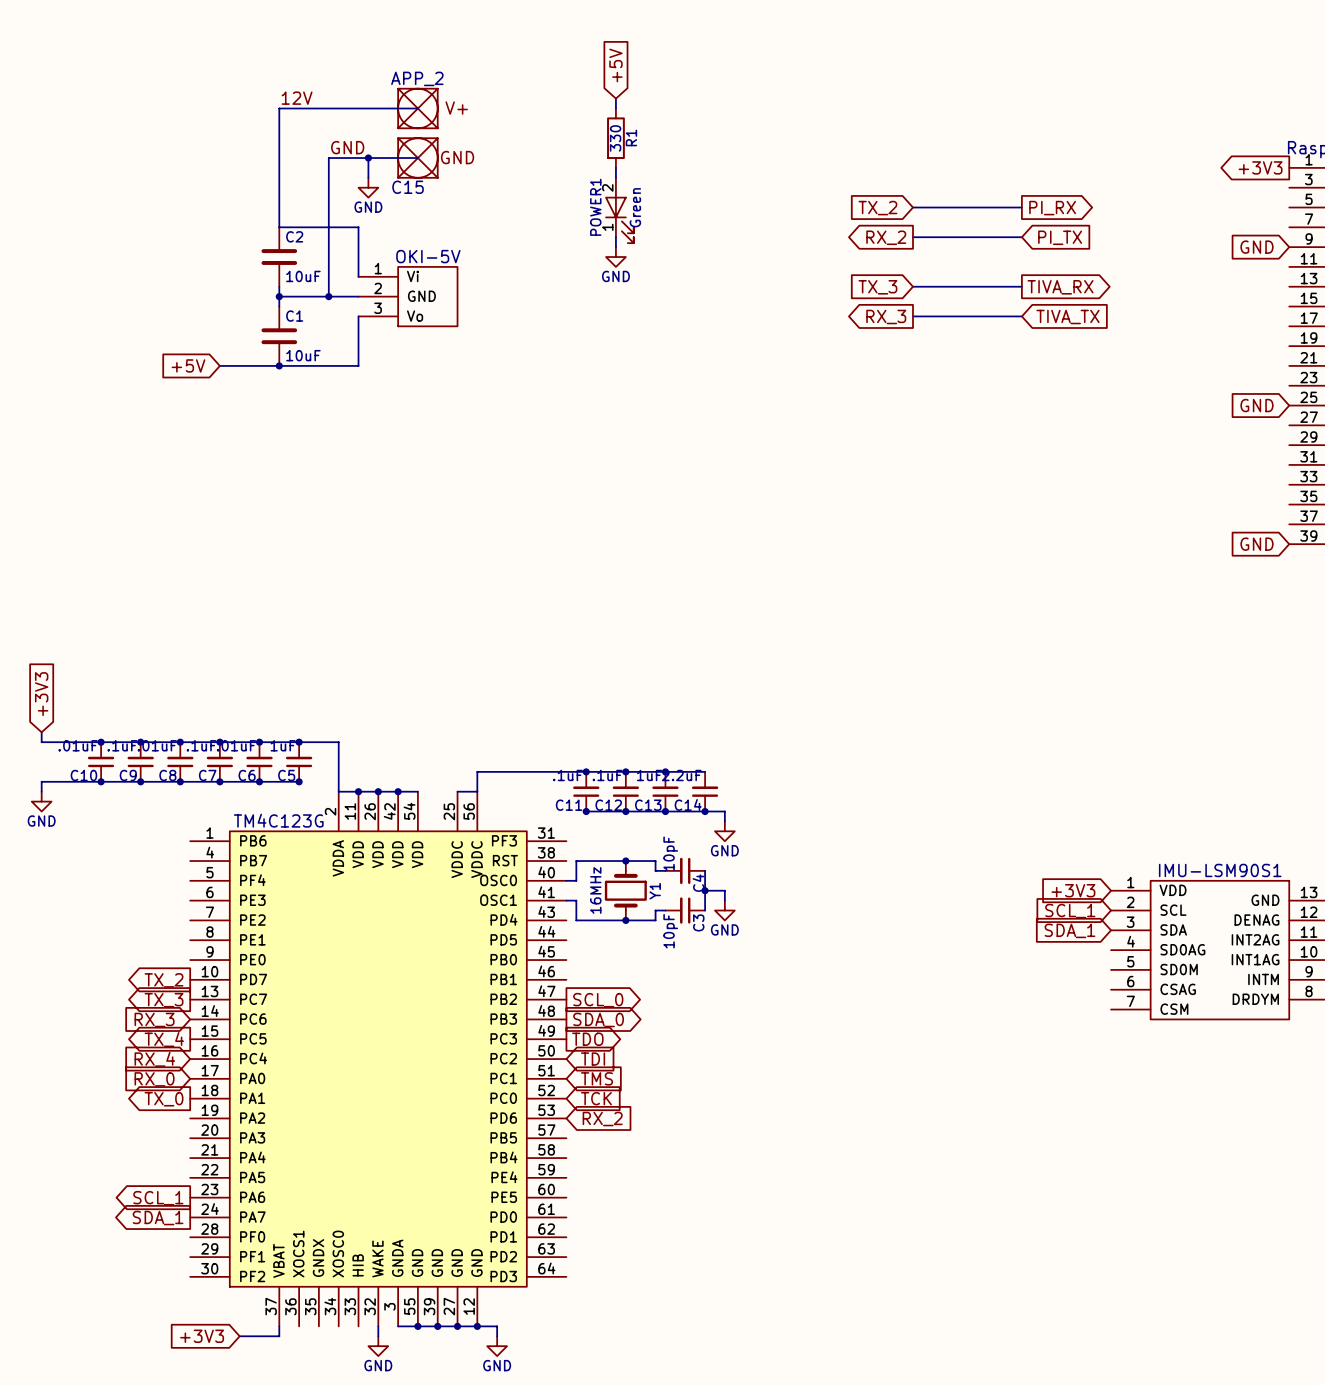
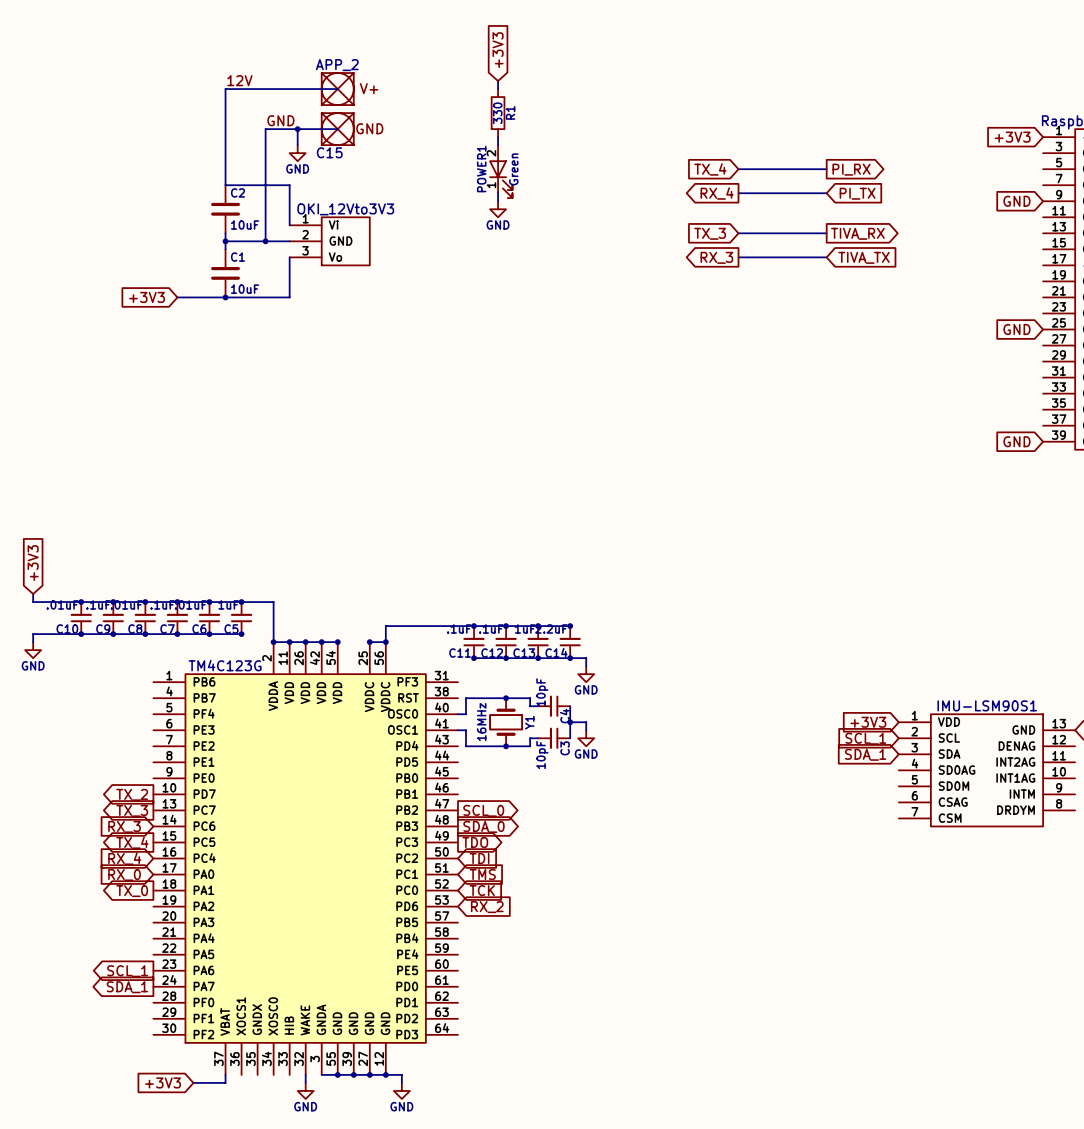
global label: +5V (615, 65) -> +3V3 (498, 50)
global label shape: output (1260, 167) -> input (1012, 137)
global label: TX_2 (877, 208) -> TX_4 (710, 169)
global label: RX_2 (886, 237) -> RX_4 (717, 193)
part value: OKI-5V (428, 256) -> OKI_12Vto3V3 (345, 209)
global label: +5V (188, 365) -> +3V3 (146, 297)
junction: none -> (570, 626)
junction: none -> (273, 642)
junction: none -> (337, 642)
junction: none -> (369, 642)
junction: none -> (385, 642)

